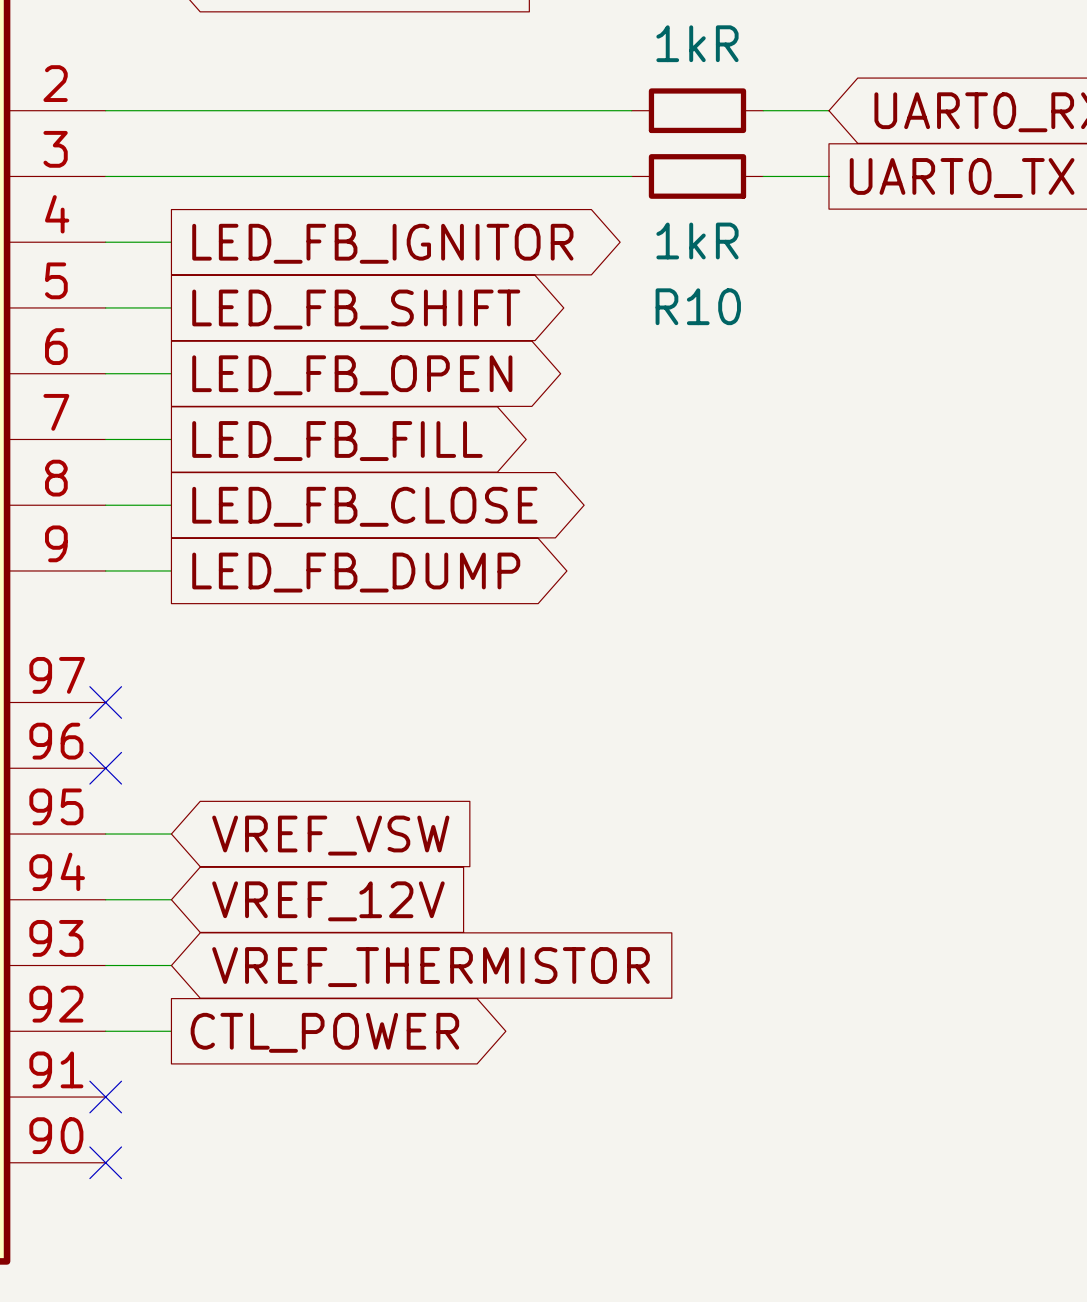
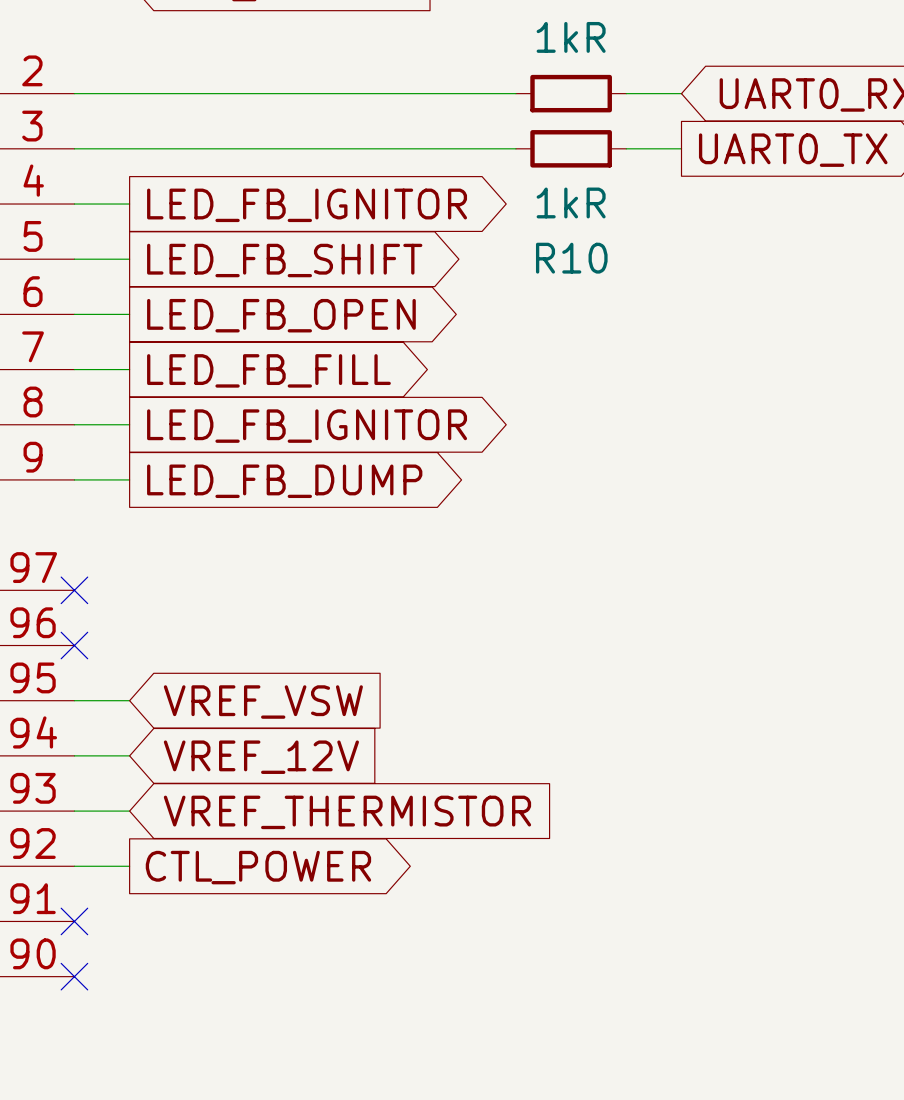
global label: LED_FB_CLOSE (364, 506) -> LED_FB_IGNITOR (307, 426)

